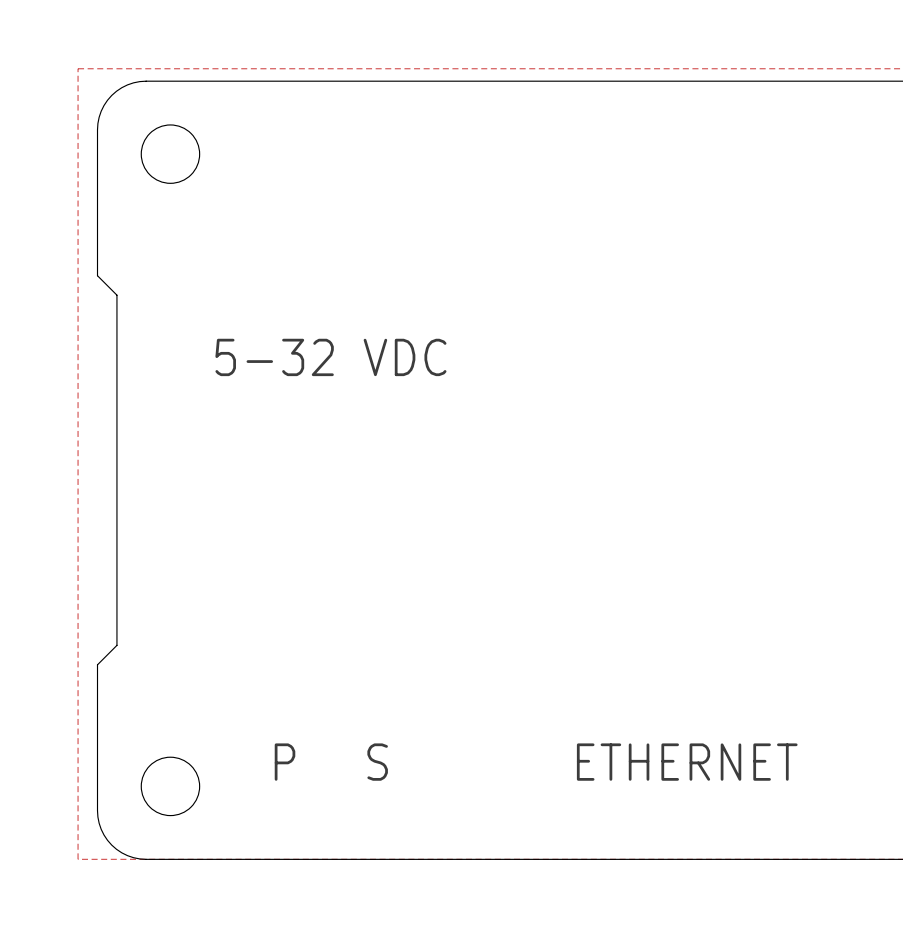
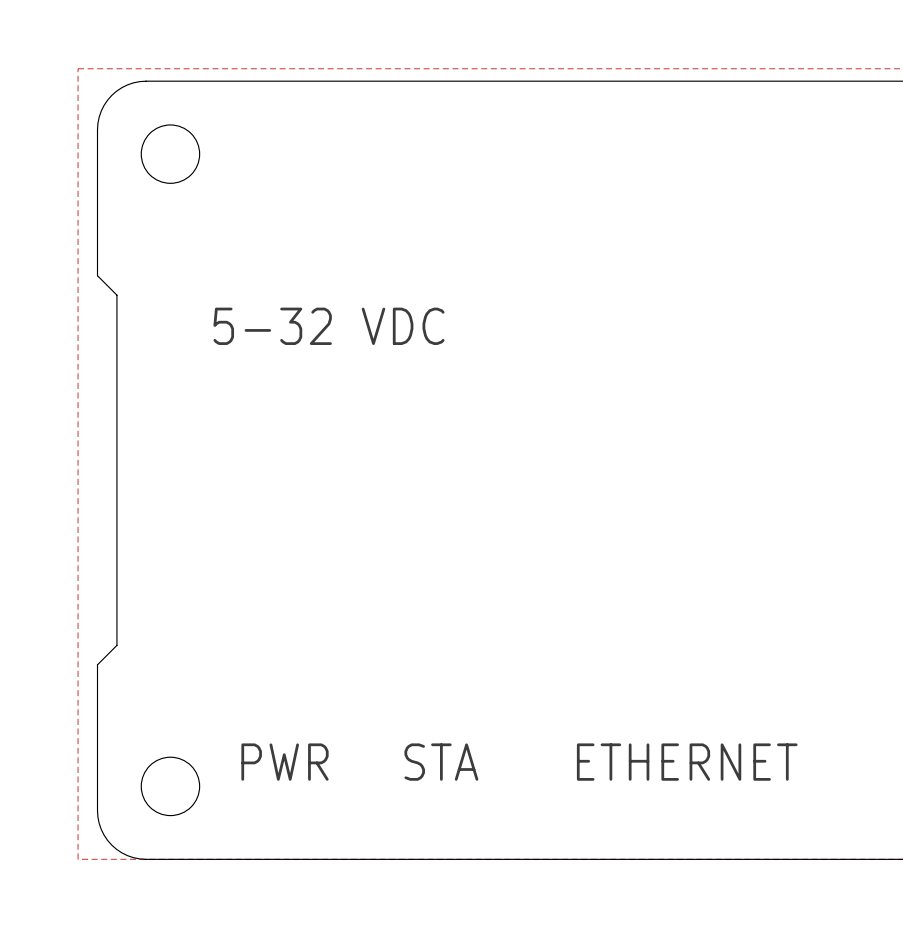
text position: 5-32 VDC (330, 357) -> 5-32 VDC (329, 326)
text: P (285, 762) -> PWR (285, 762)
text: S (377, 762) -> none
text: none -> STA (441, 762)

